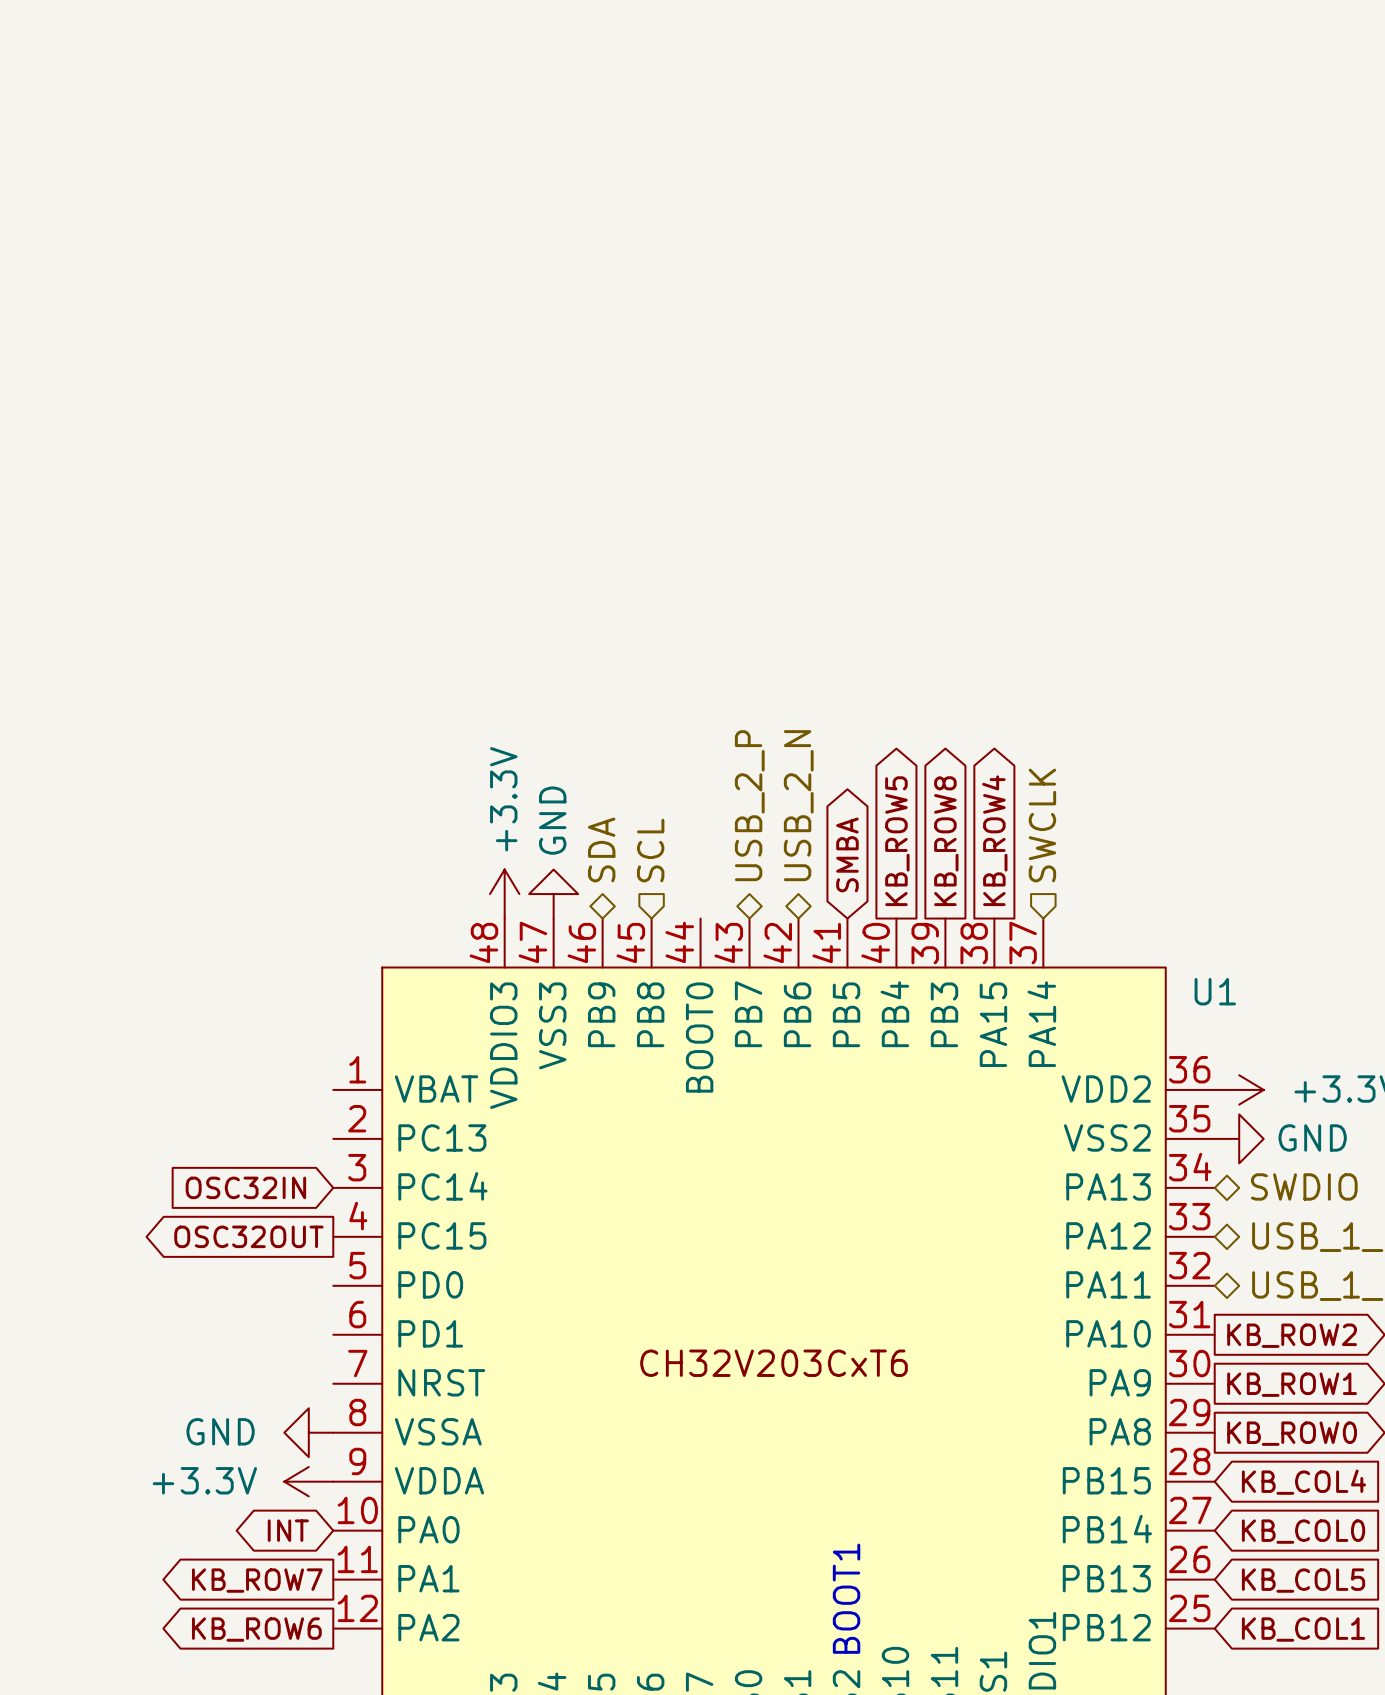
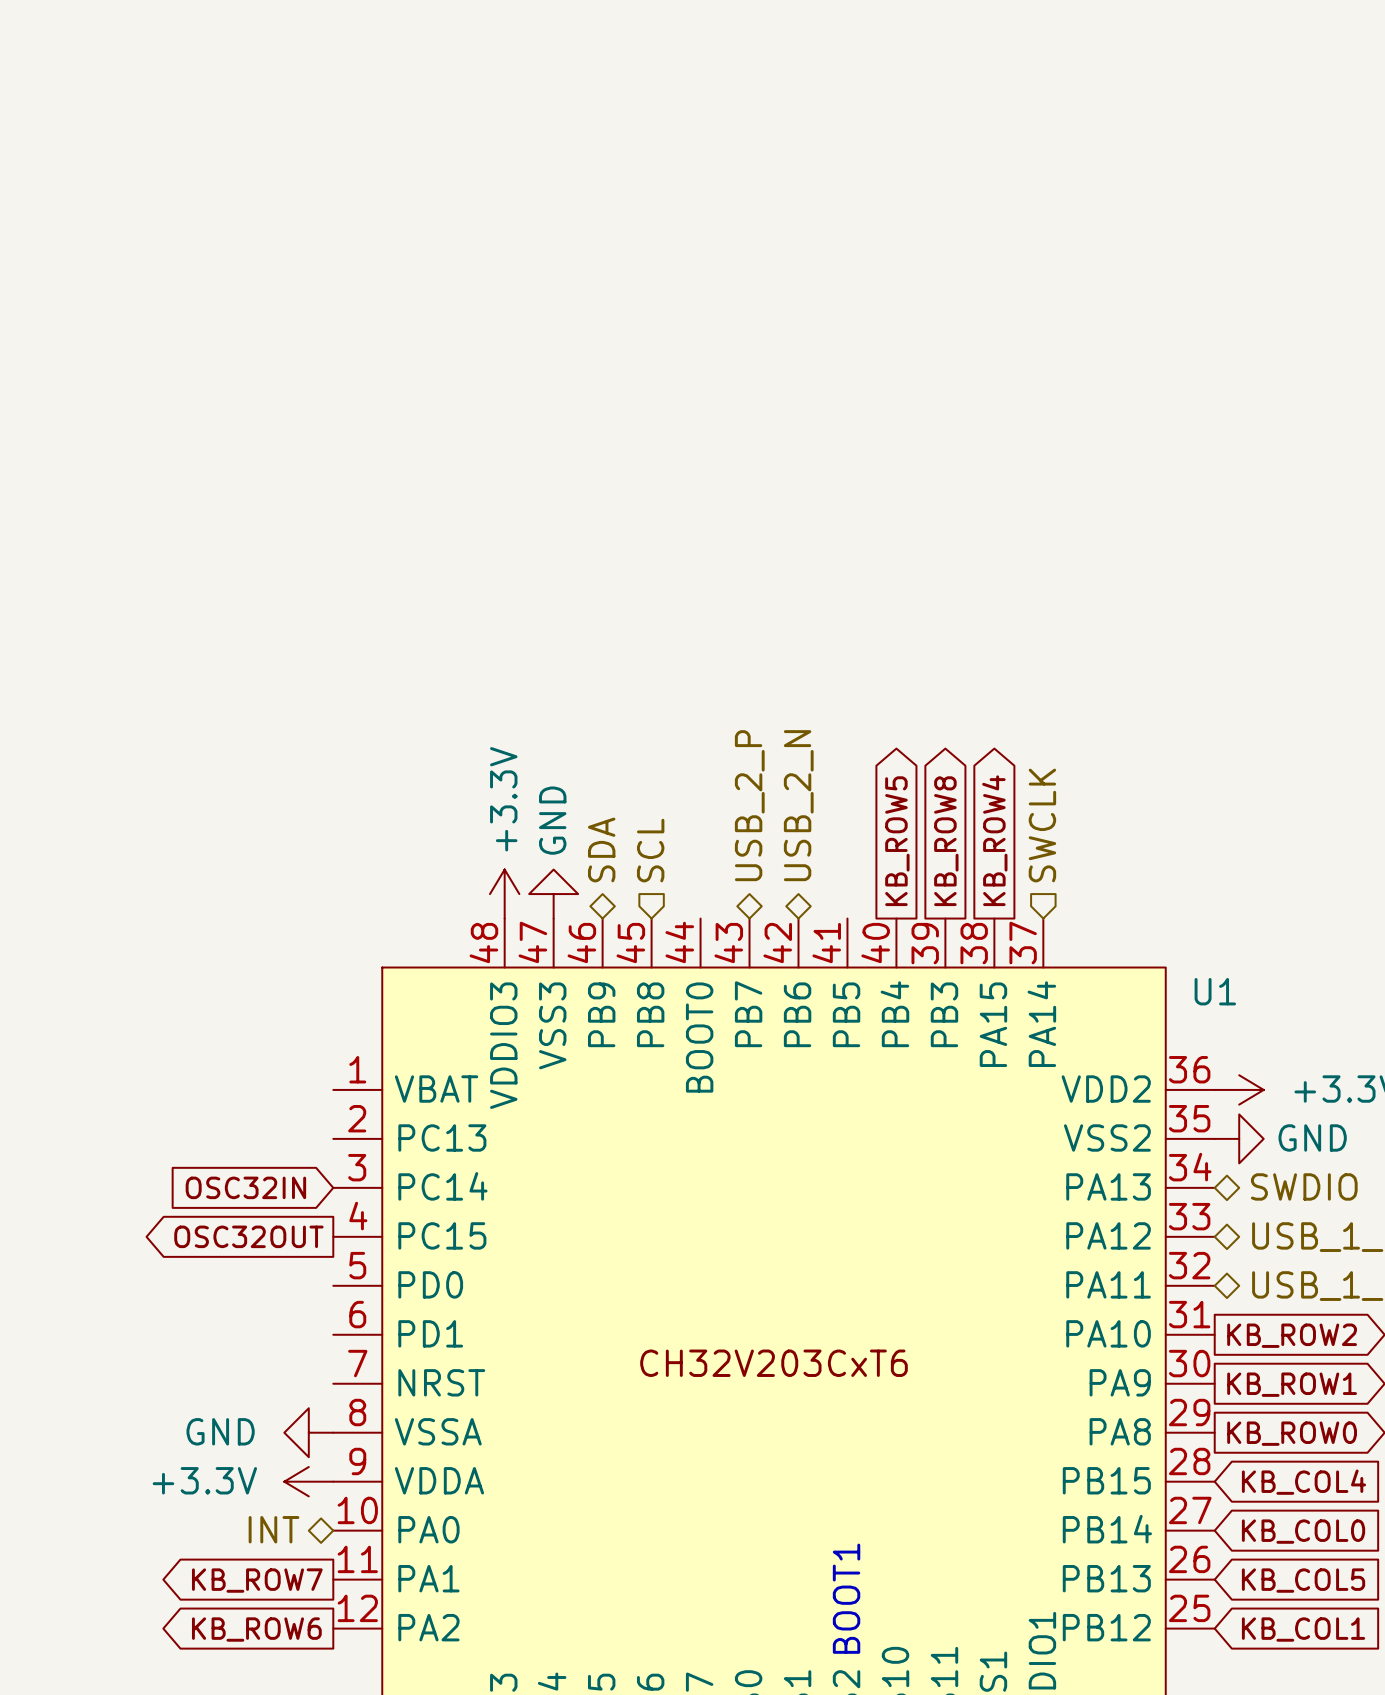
global label: SMBA (847, 854) -> none
hierarchical label: none -> INT (274, 1529)
global label: INT (288, 1530) -> none

